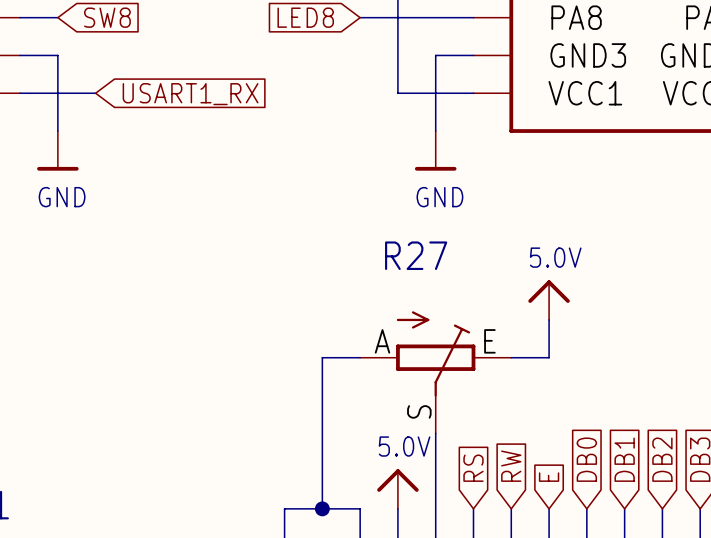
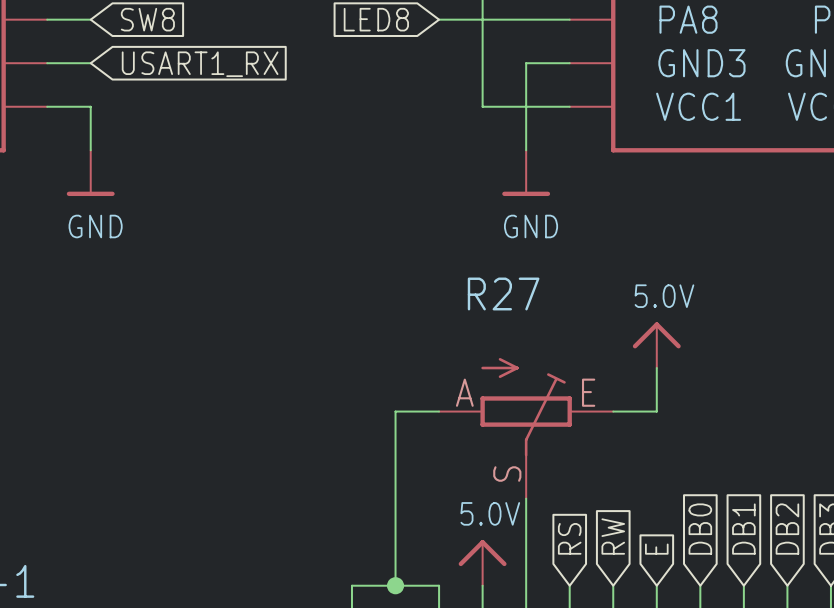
wire: (57, 55) (57, 93) (95, 93) -> none
global label position: USART1_RX (190, 94) -> USART1_RX (200, 64)

